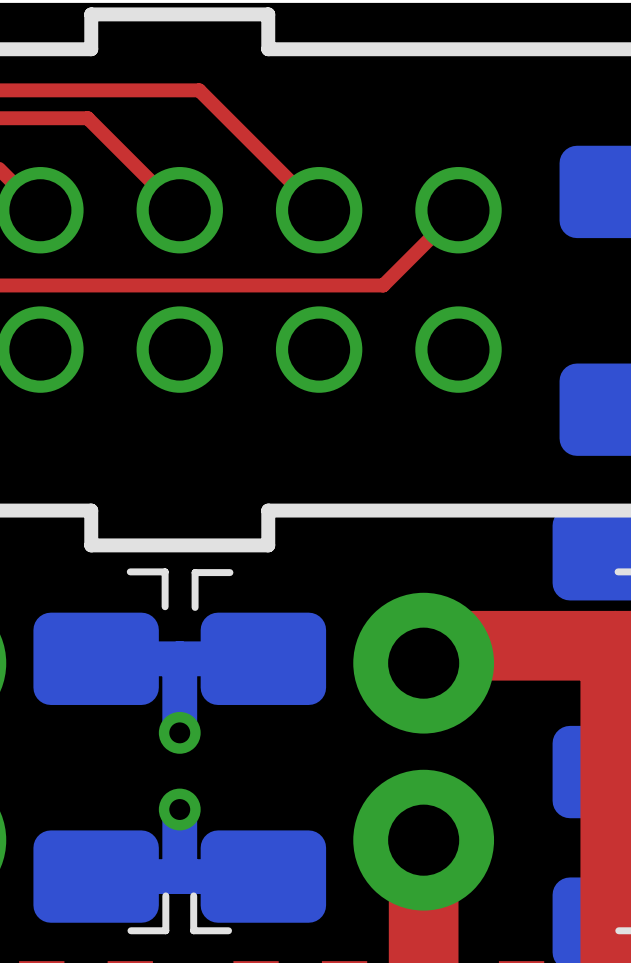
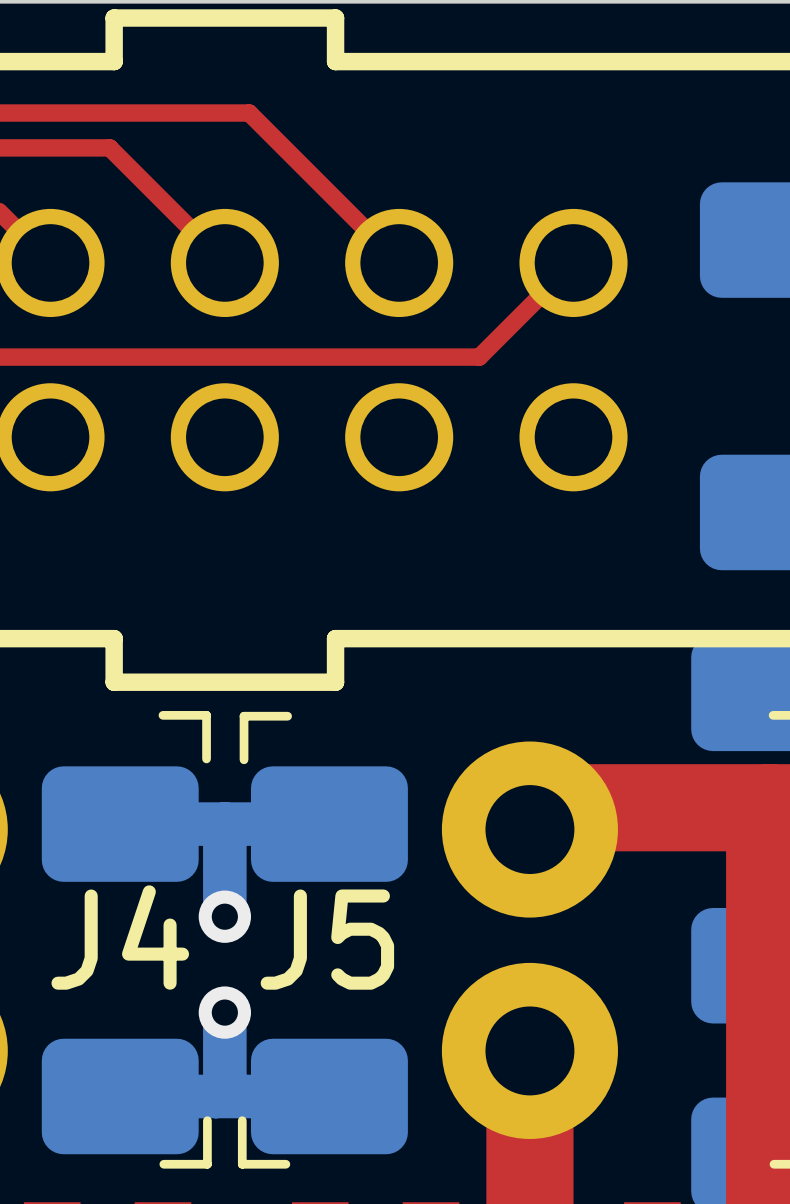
J4 name: none -> J4 (120, 937)
J5 name: none -> J5 (327, 939)

